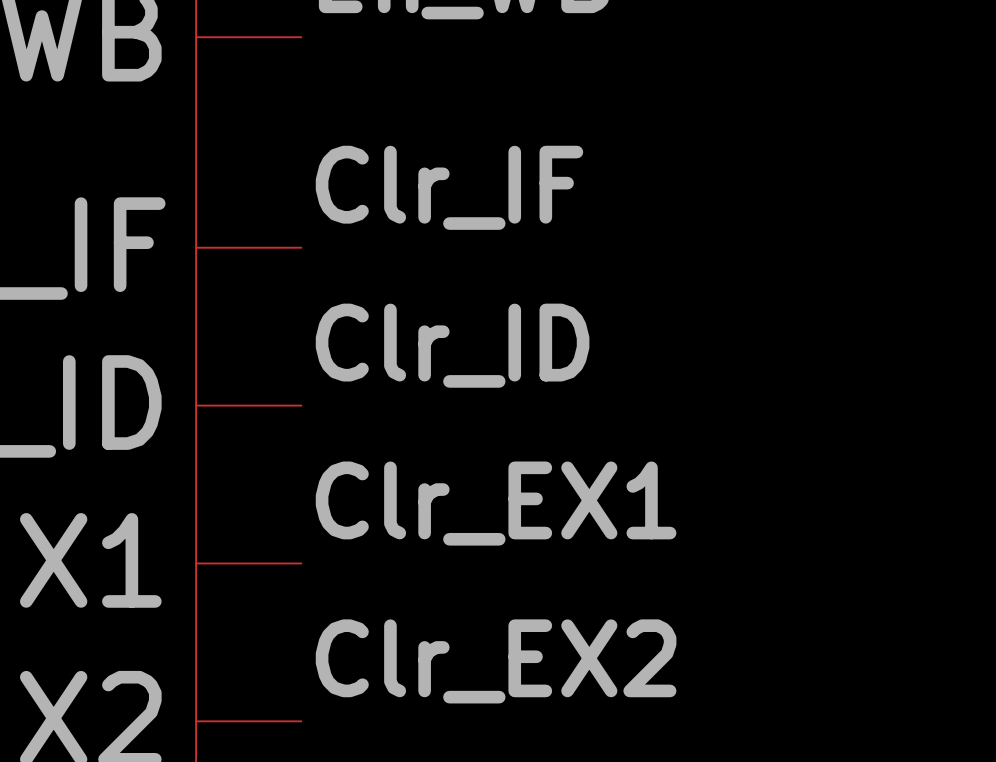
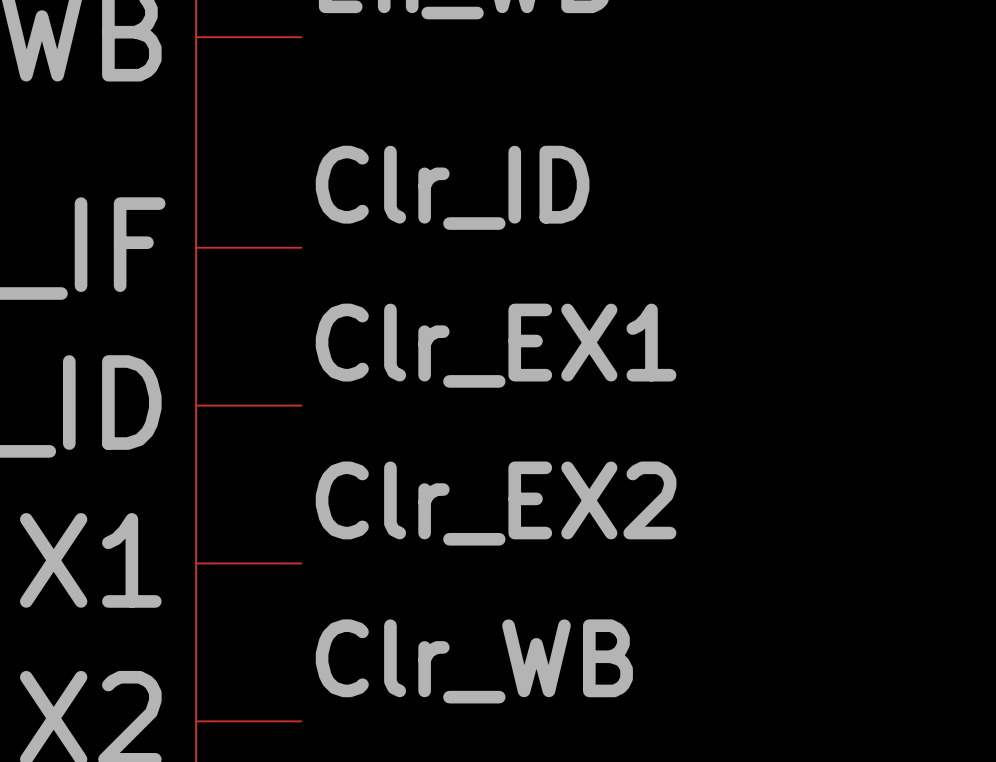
label: Clr_IF (449, 187) -> Clr_ID (452, 187)
label: Clr_ID (452, 345) -> Clr_EX1 (496, 345)
label: Clr_EX1 (496, 503) -> Clr_EX2 (496, 503)
label: Clr_EX2 (496, 661) -> Clr_WB (474, 661)

